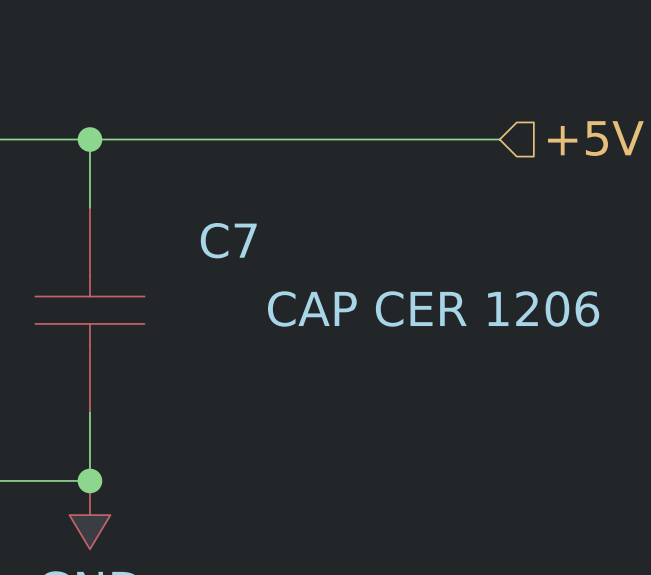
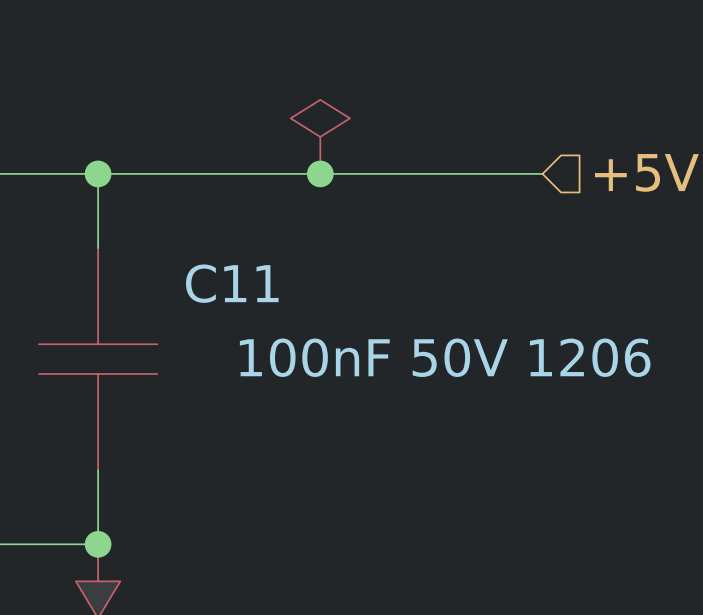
power symbol: none -> (320, 136)
junction: none -> (320, 173)
C7 name: C7 (228, 240) -> C11 (232, 283)
C7 value: CAP CER 1206 (433, 308) -> 100nF 50V 1206 (445, 357)

